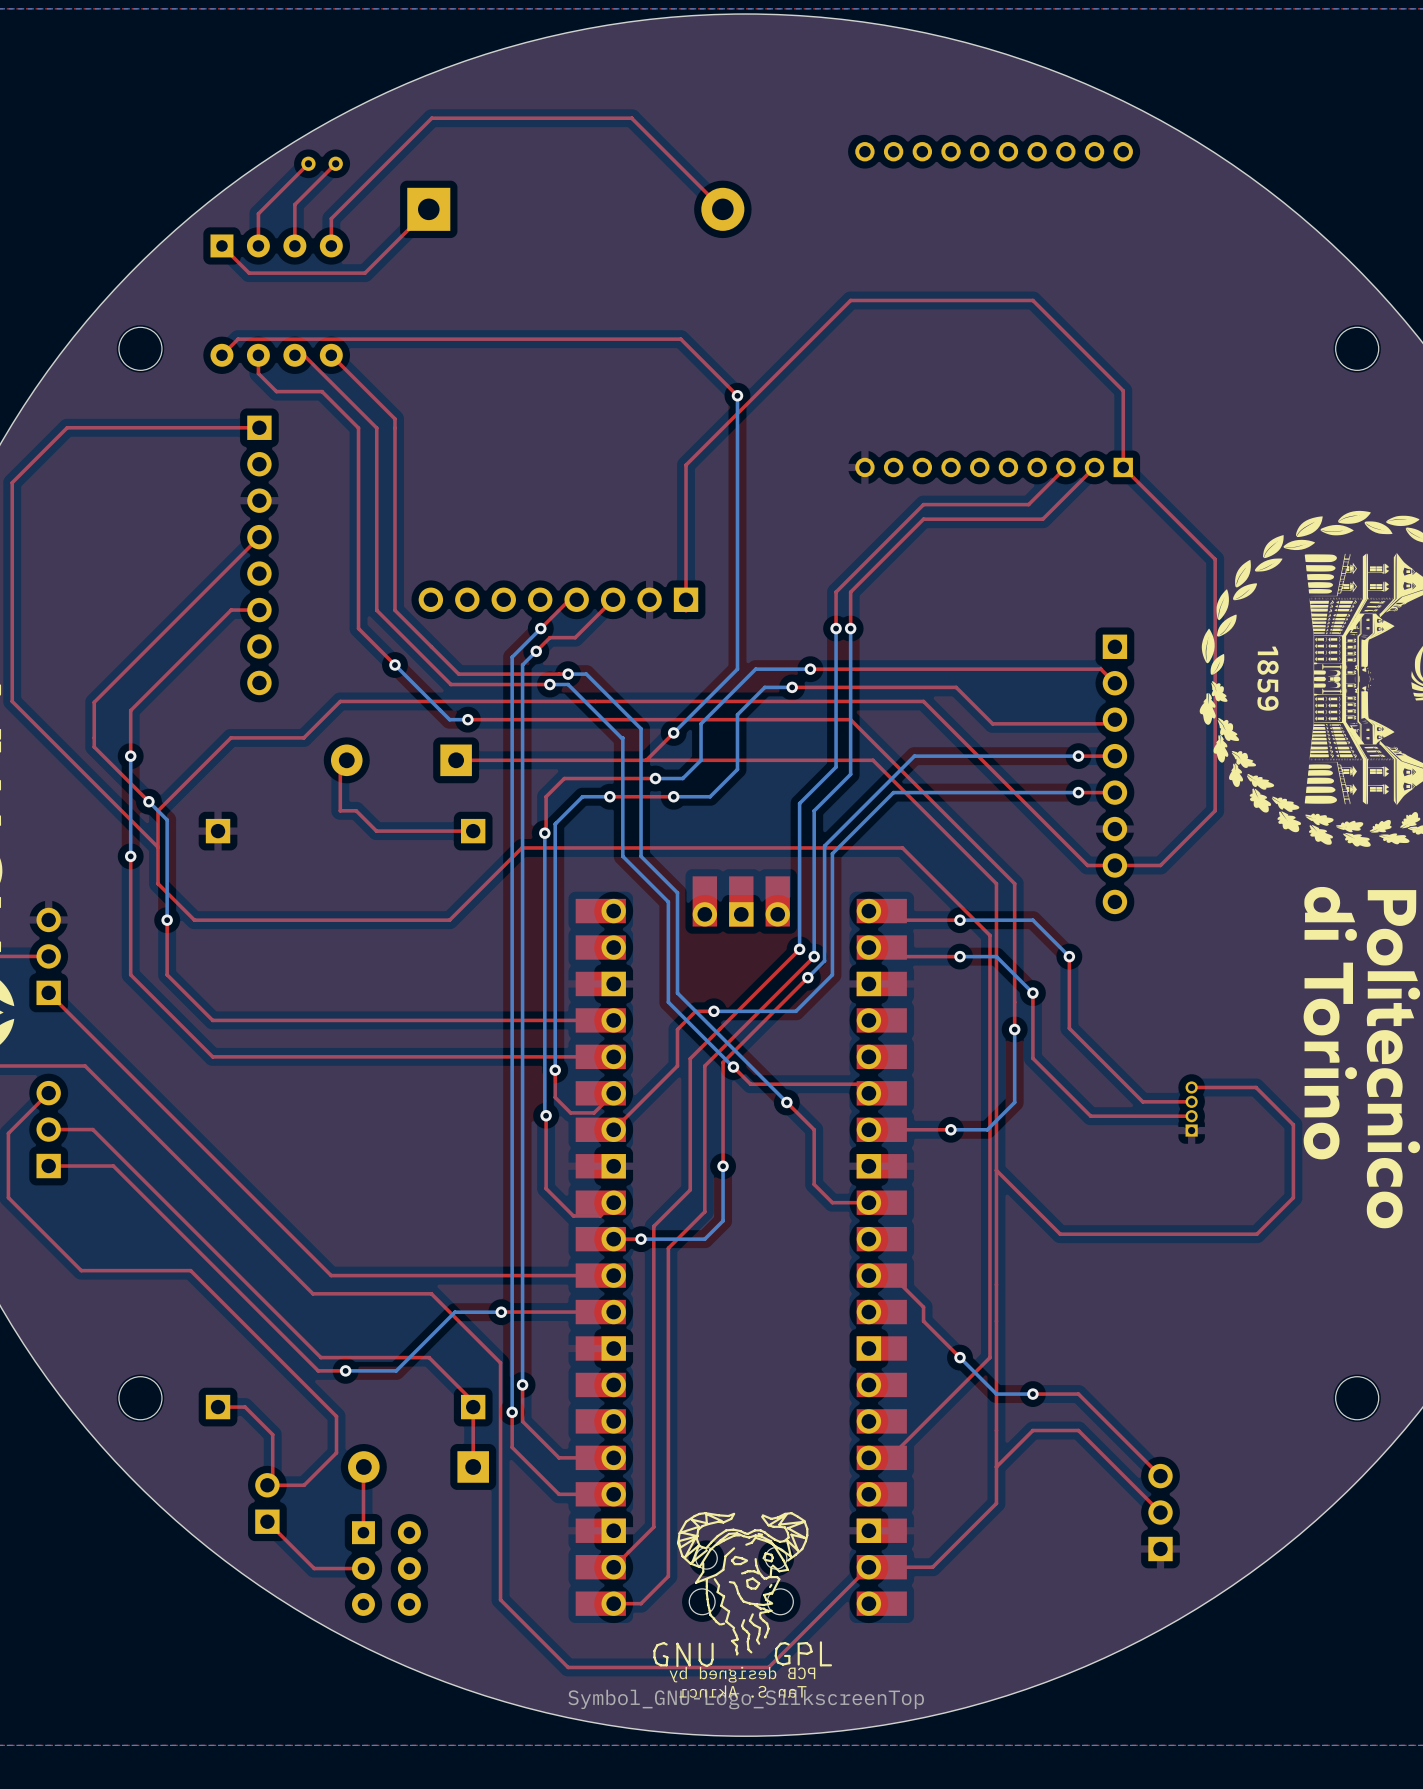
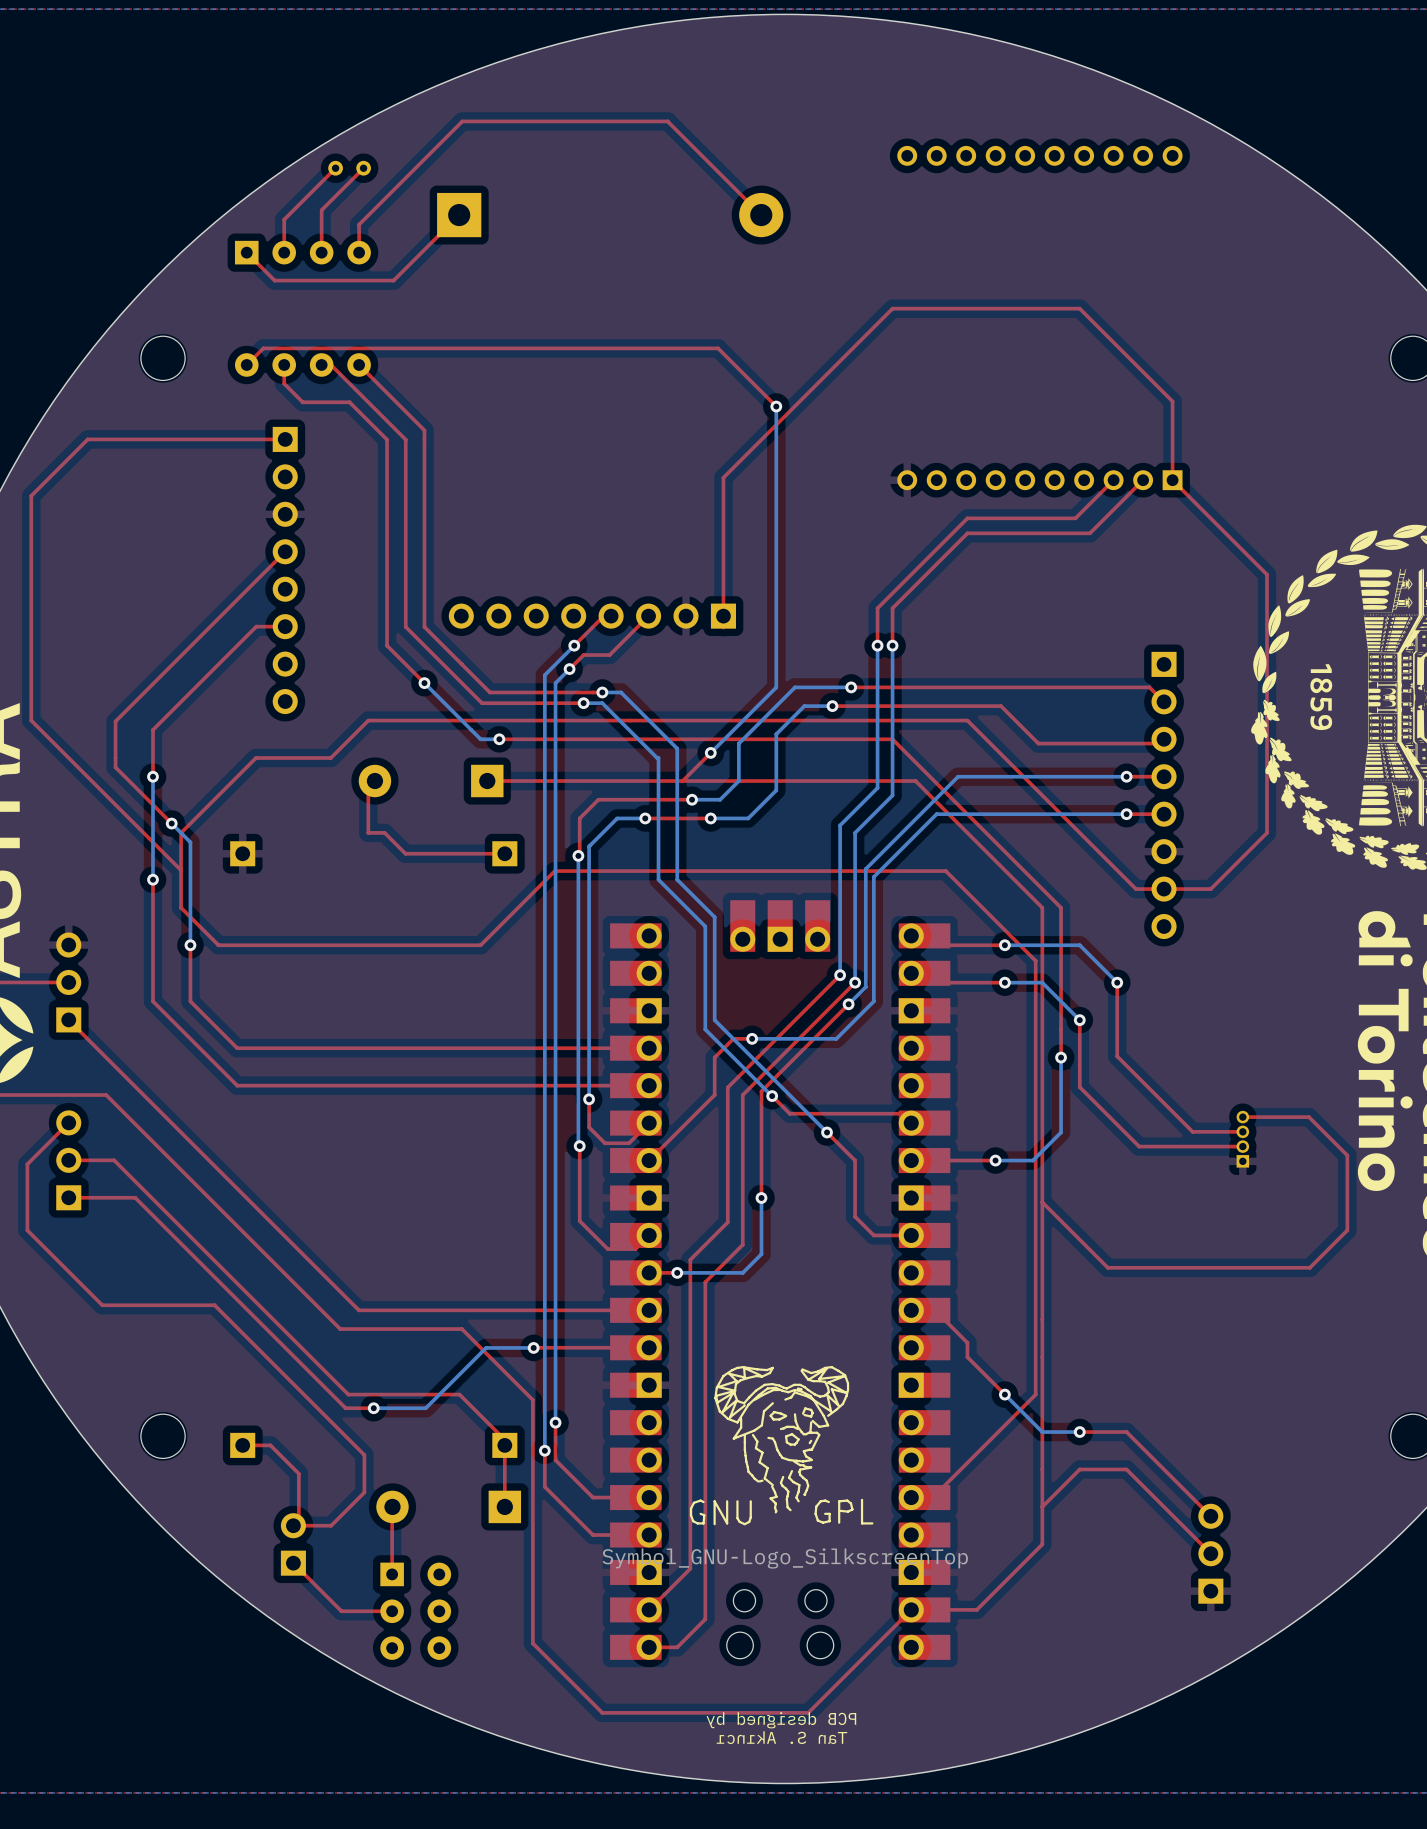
drawing position: (742, 1589) -> (781, 1445)

